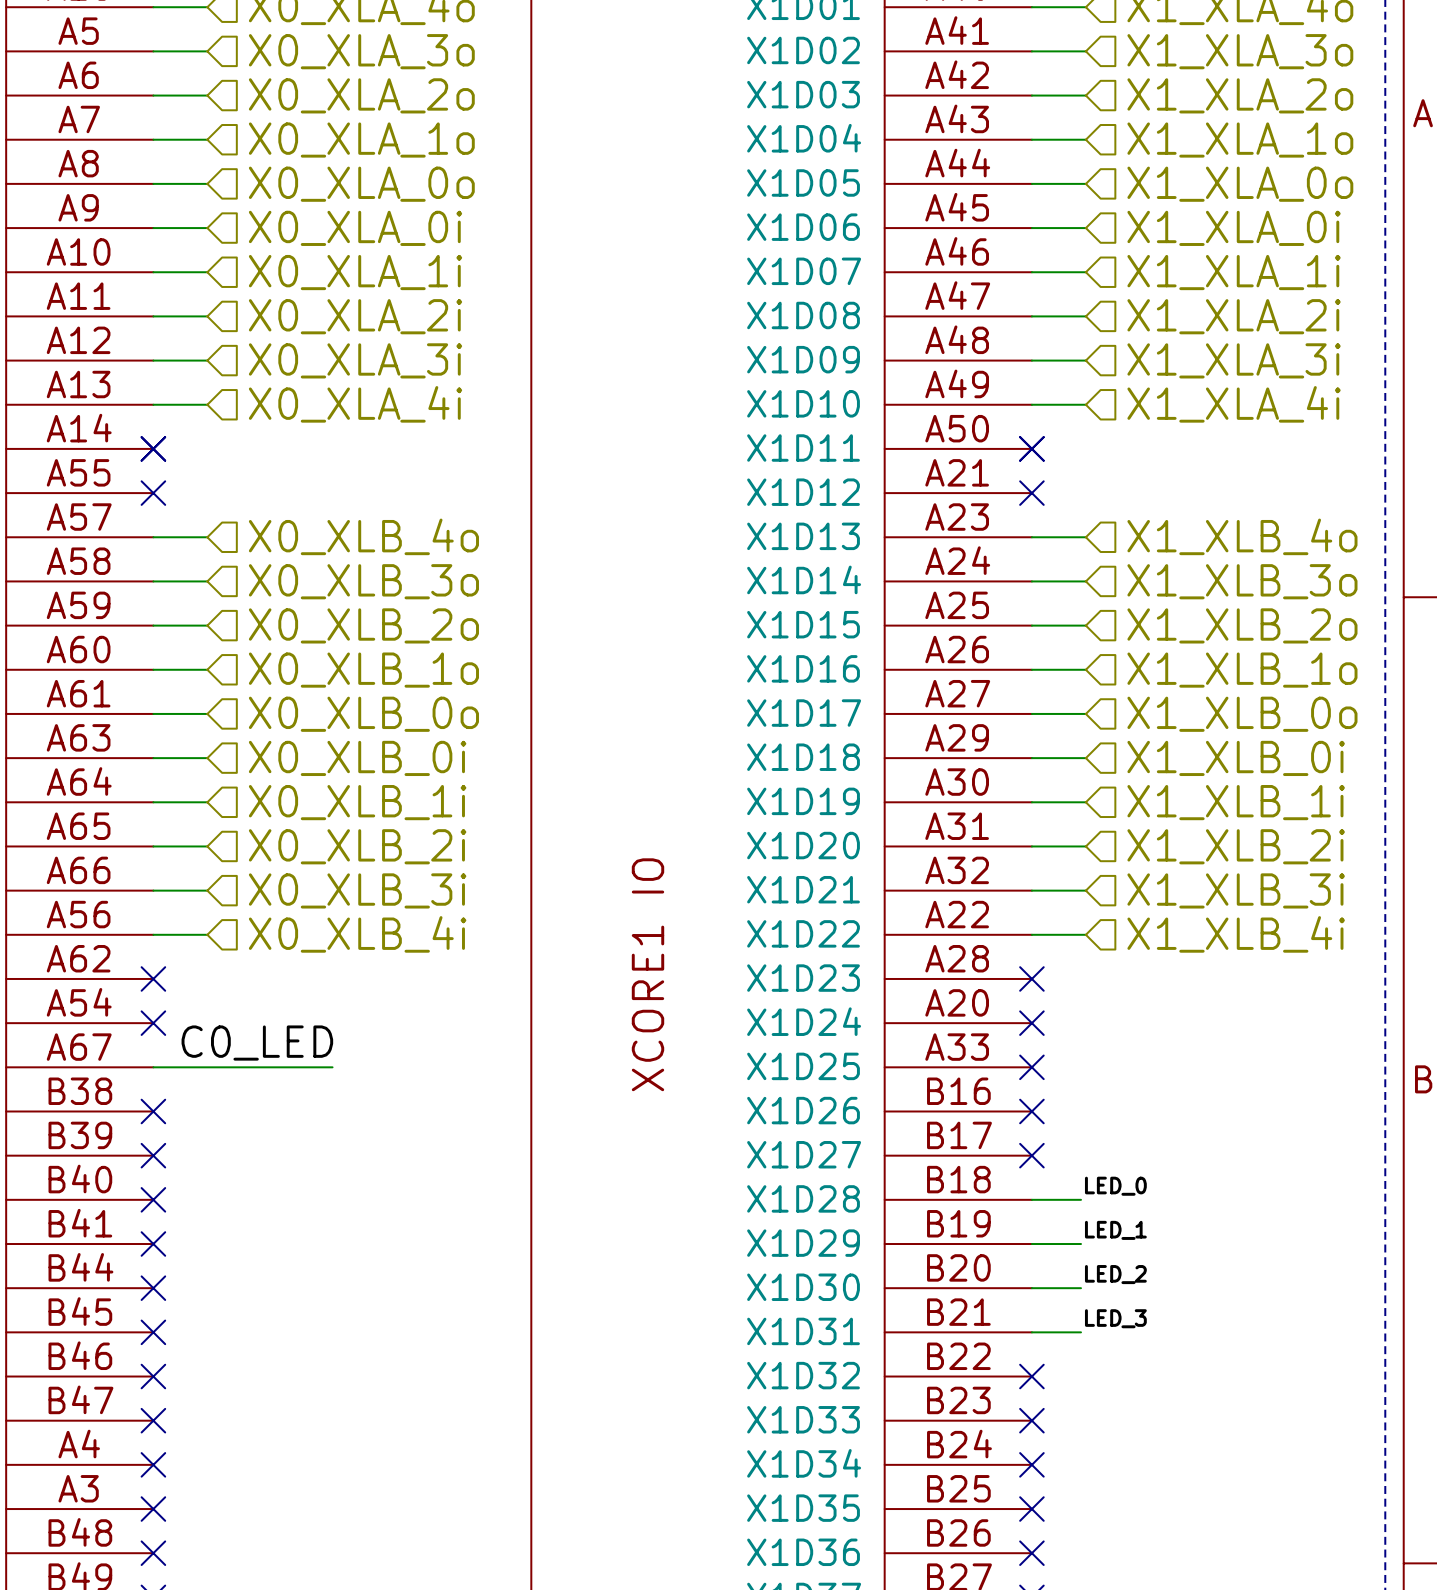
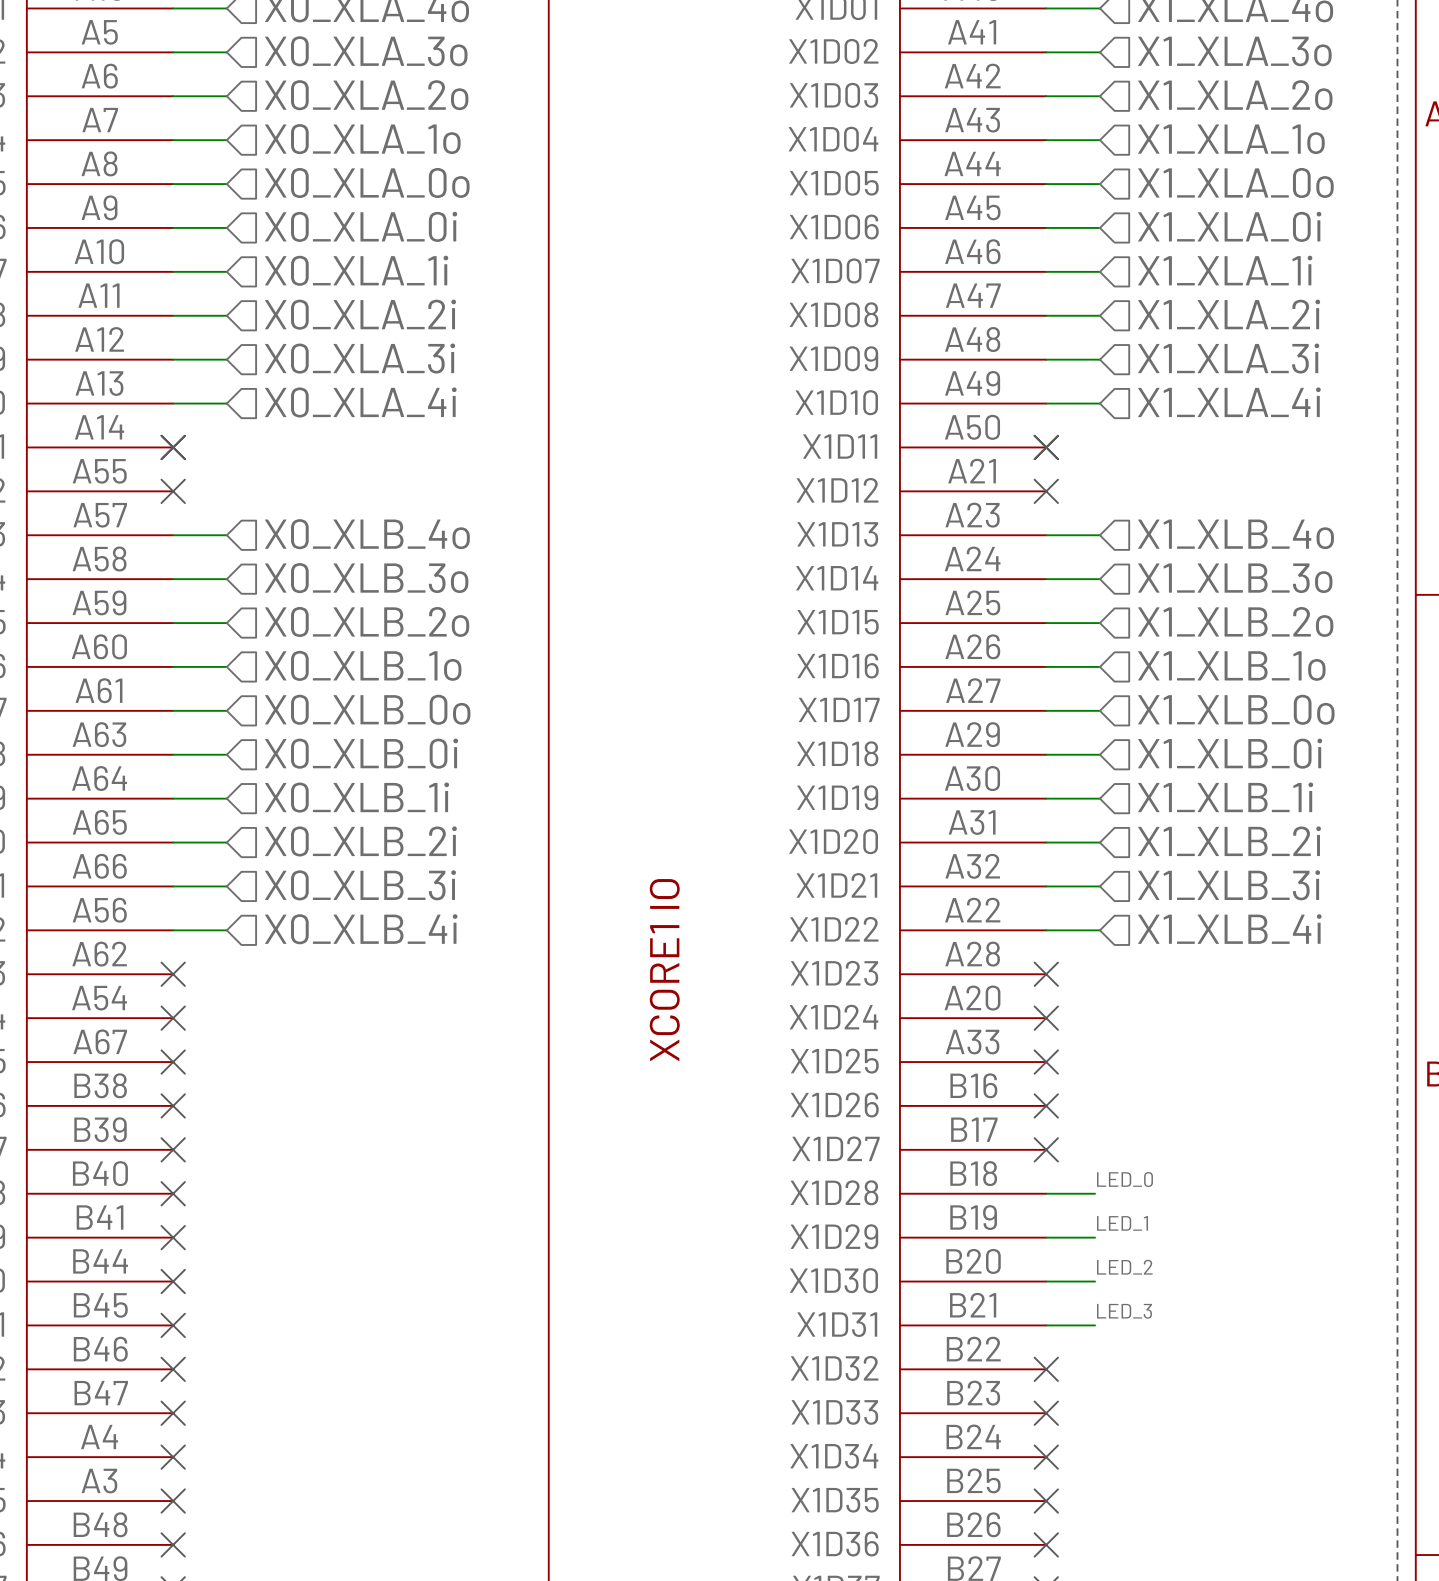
label: C0_LED (257, 1043) -> none
wire: (153, 1067) (332, 1067) -> none
no-connect mark: none -> (173, 1062)

